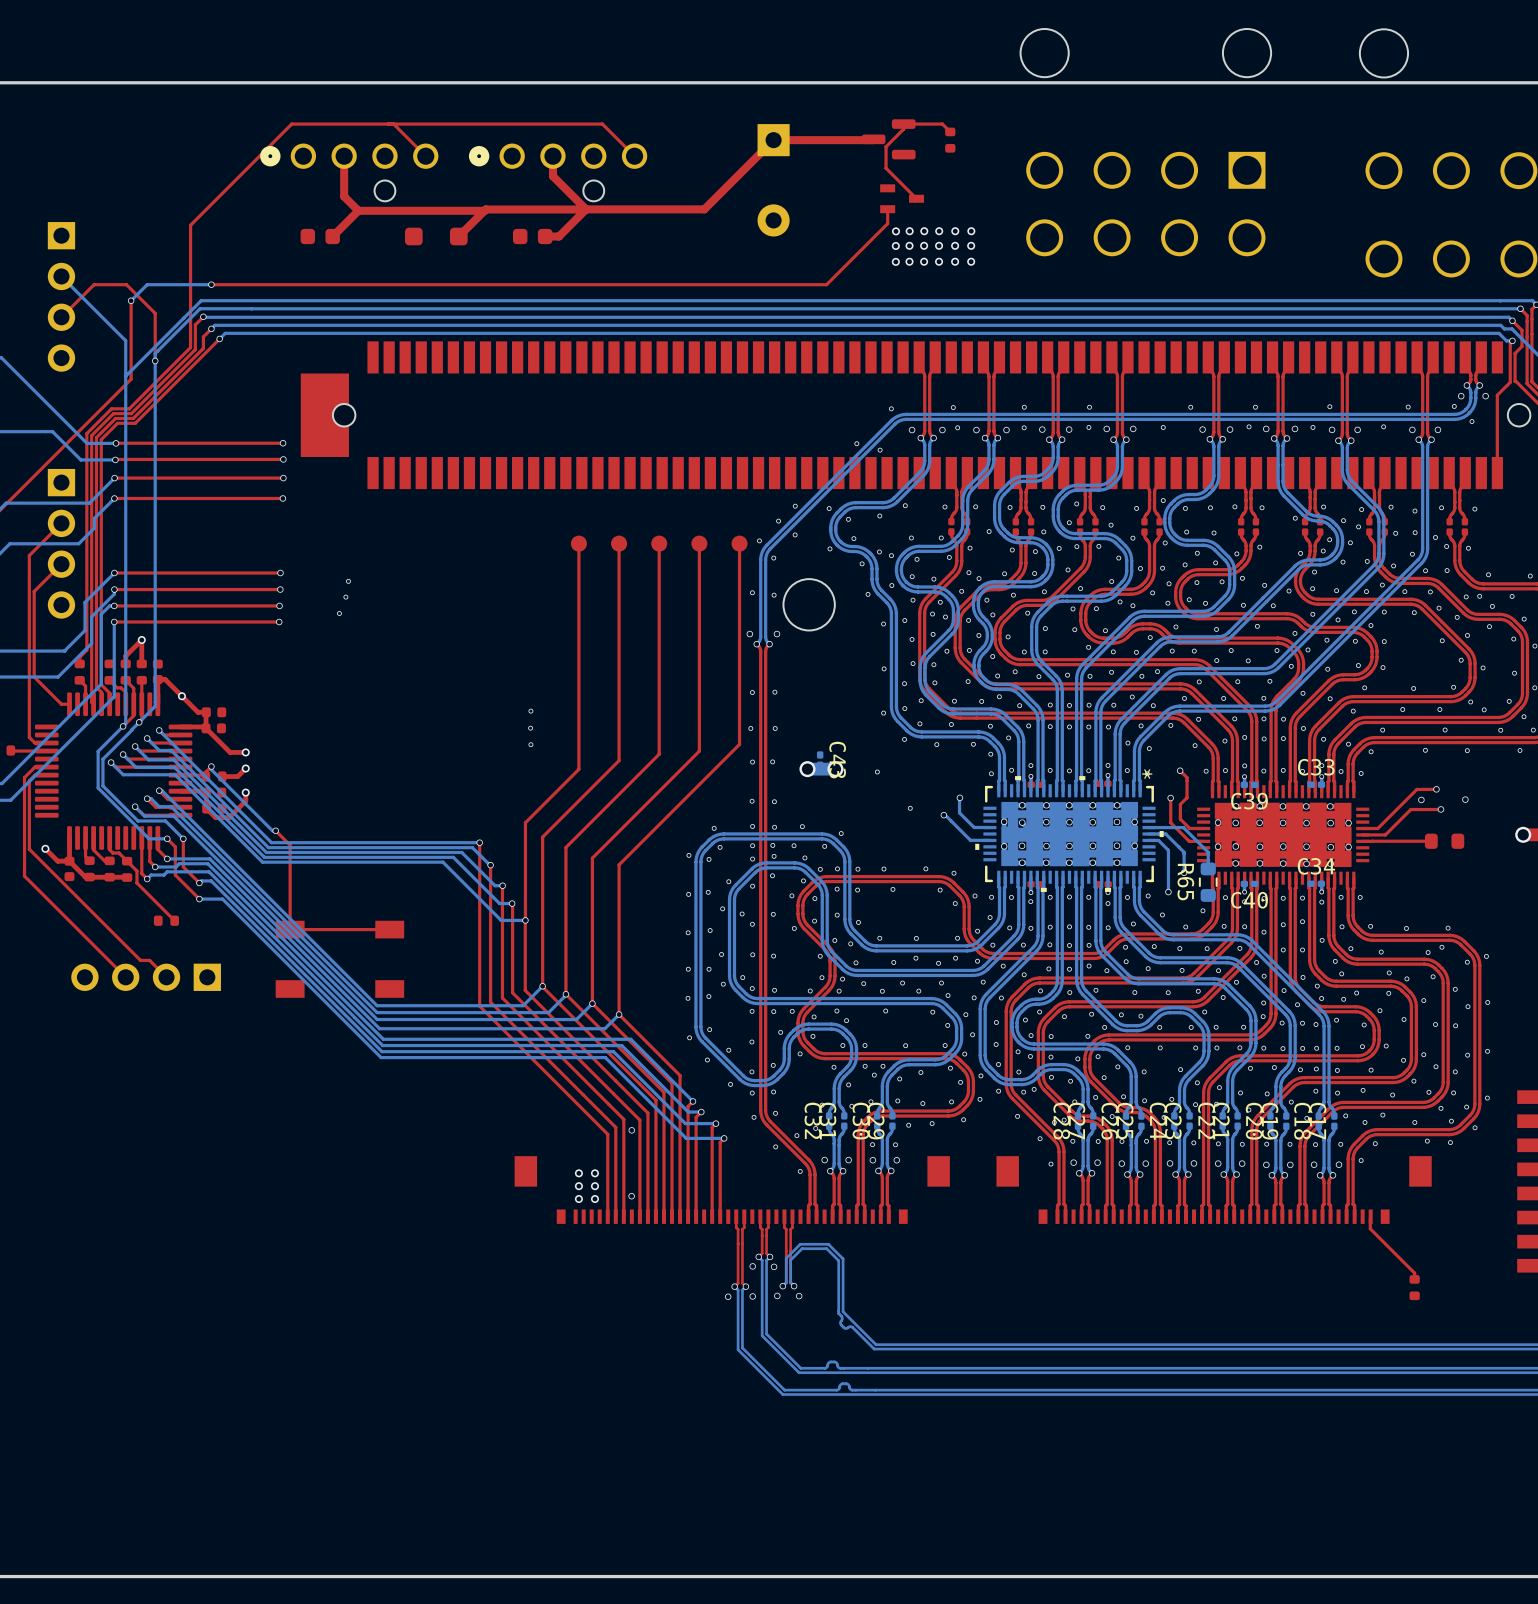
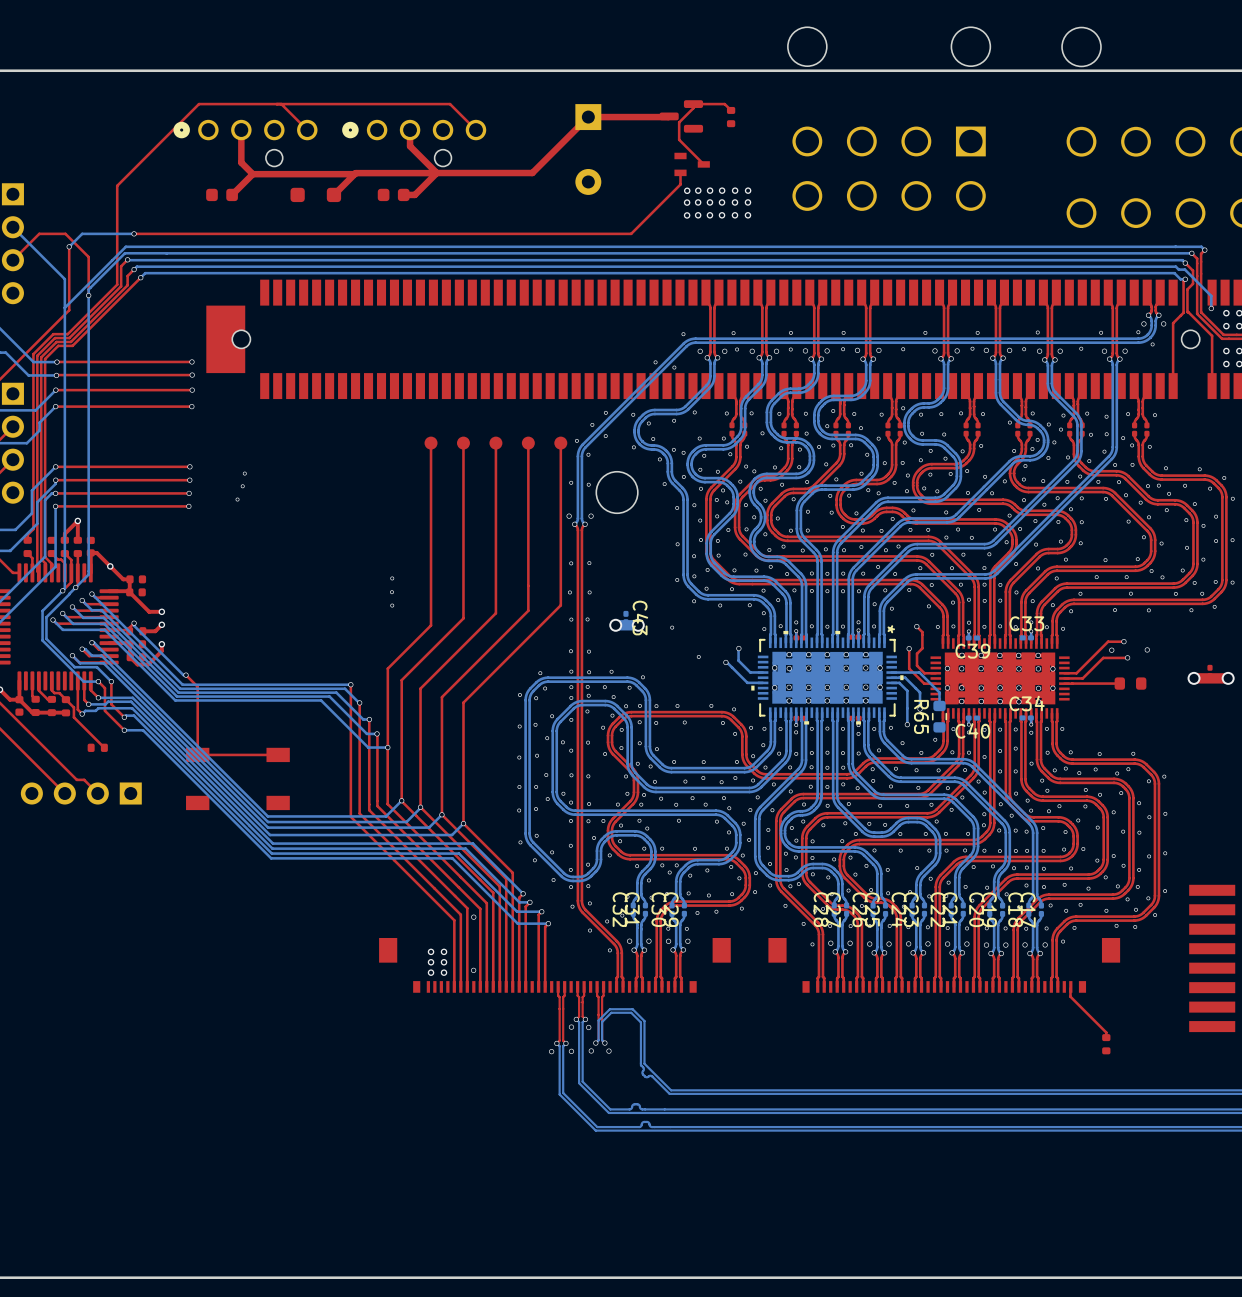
via: none -> (1065, 768)
via: none -> (1095, 769)

